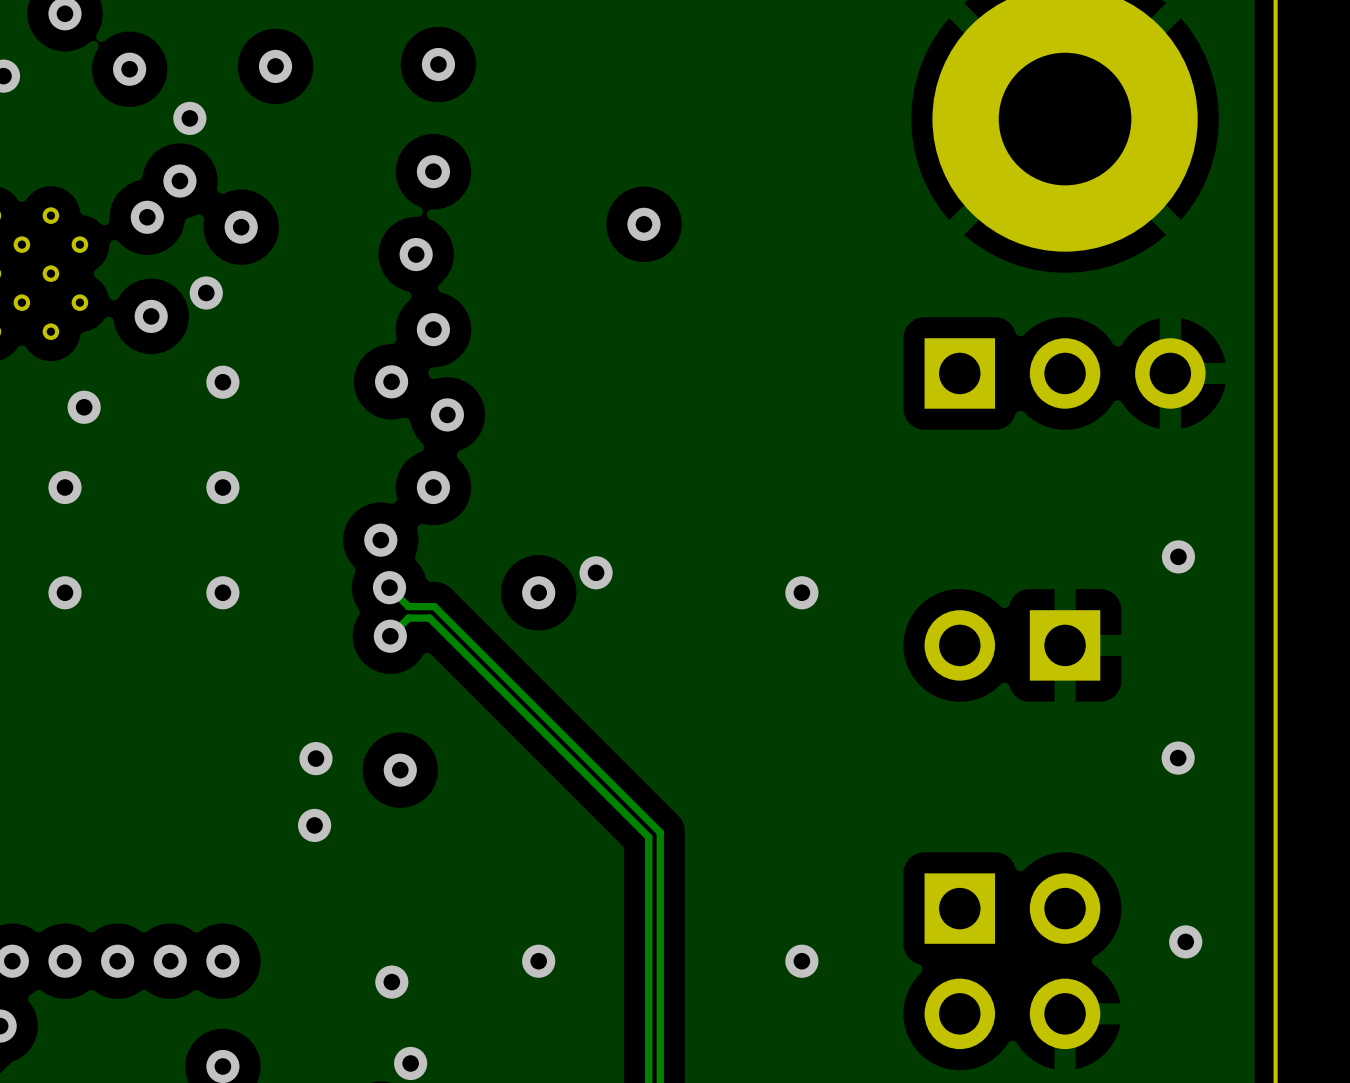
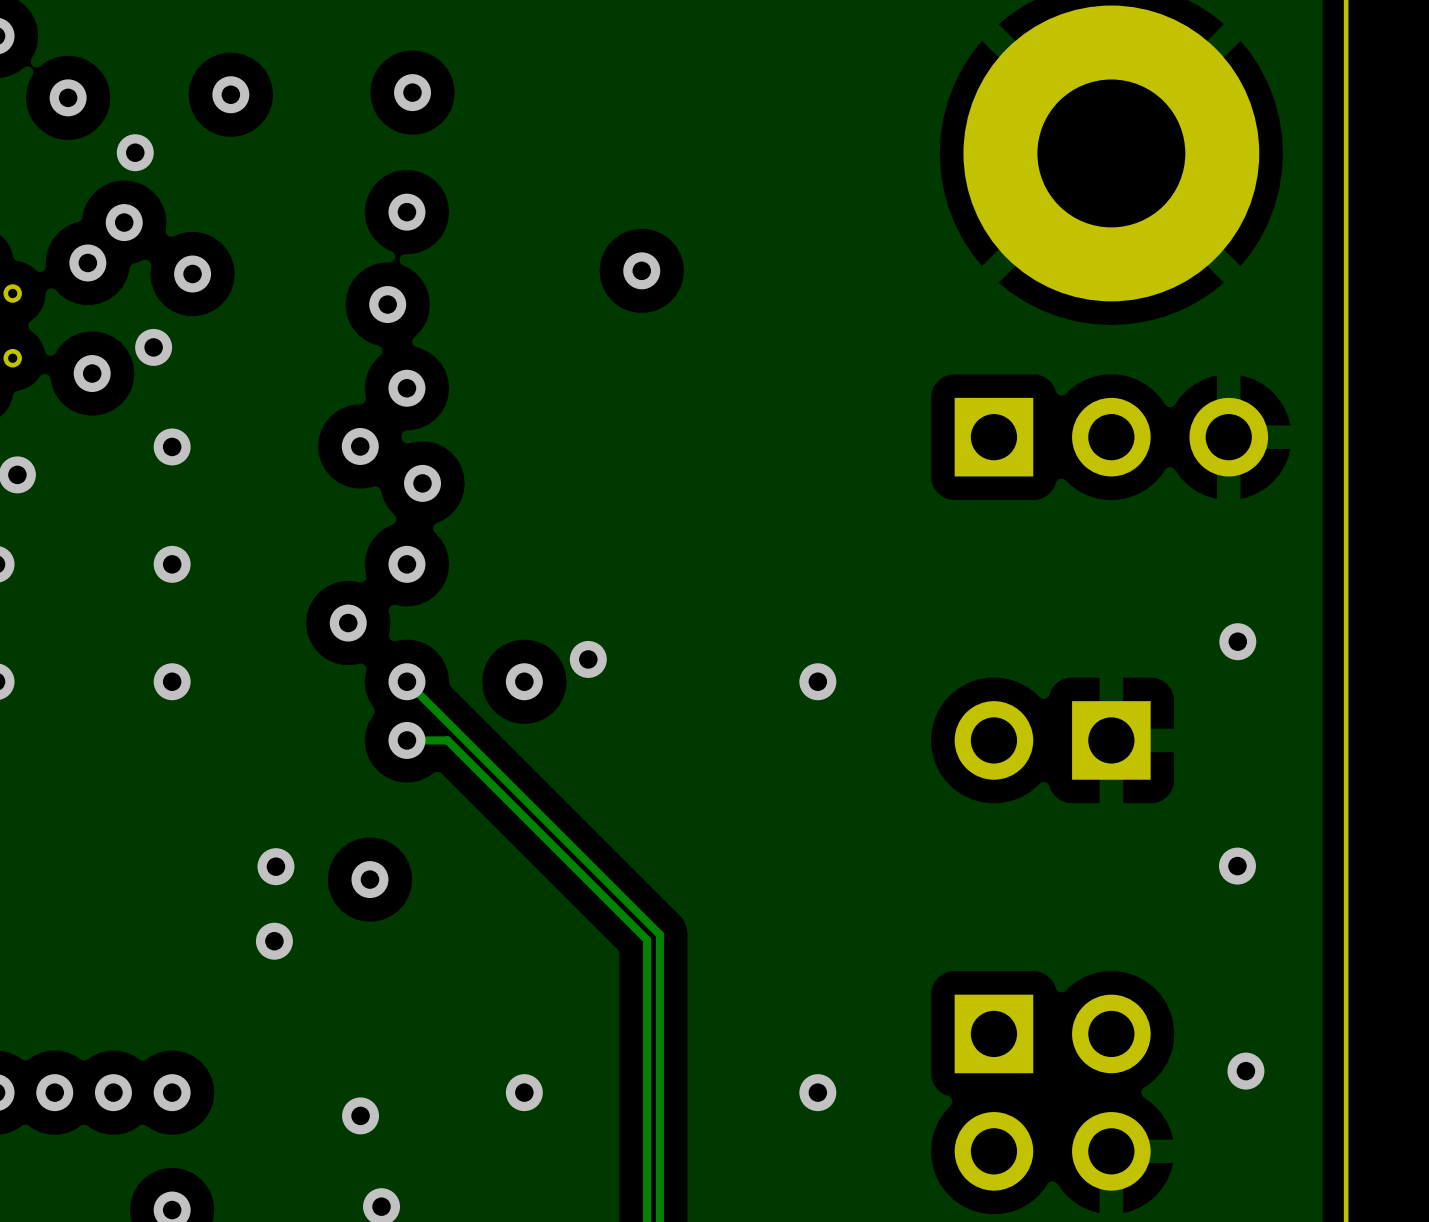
track: (389, 587) (408, 606) (434, 606) (660, 832) -> (406, 681) (659, 934) (659, 949)
via: (389, 587) -> none
via: none -> (406, 681)
track: (390, 636) (408, 618) (429, 618) (648, 837) -> (406, 740) (447, 740) (647, 939) (647, 954)
via: (390, 636) -> none
via: none -> (406, 740)

